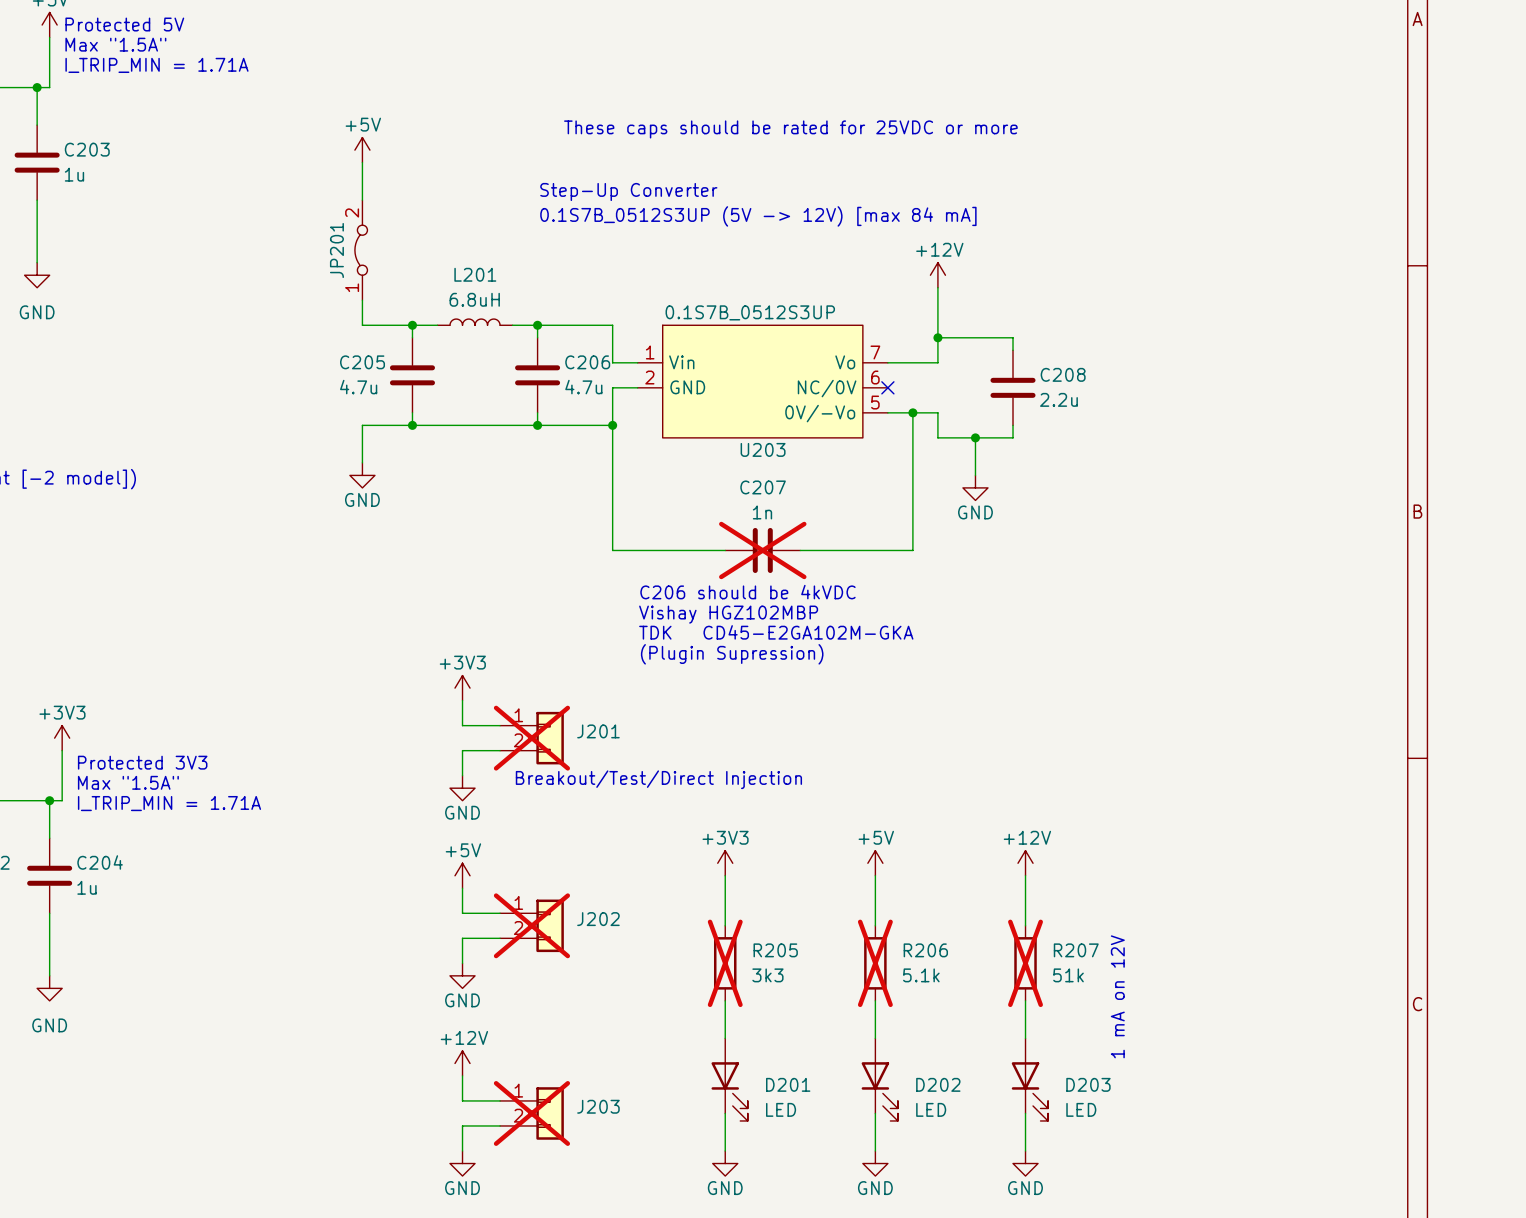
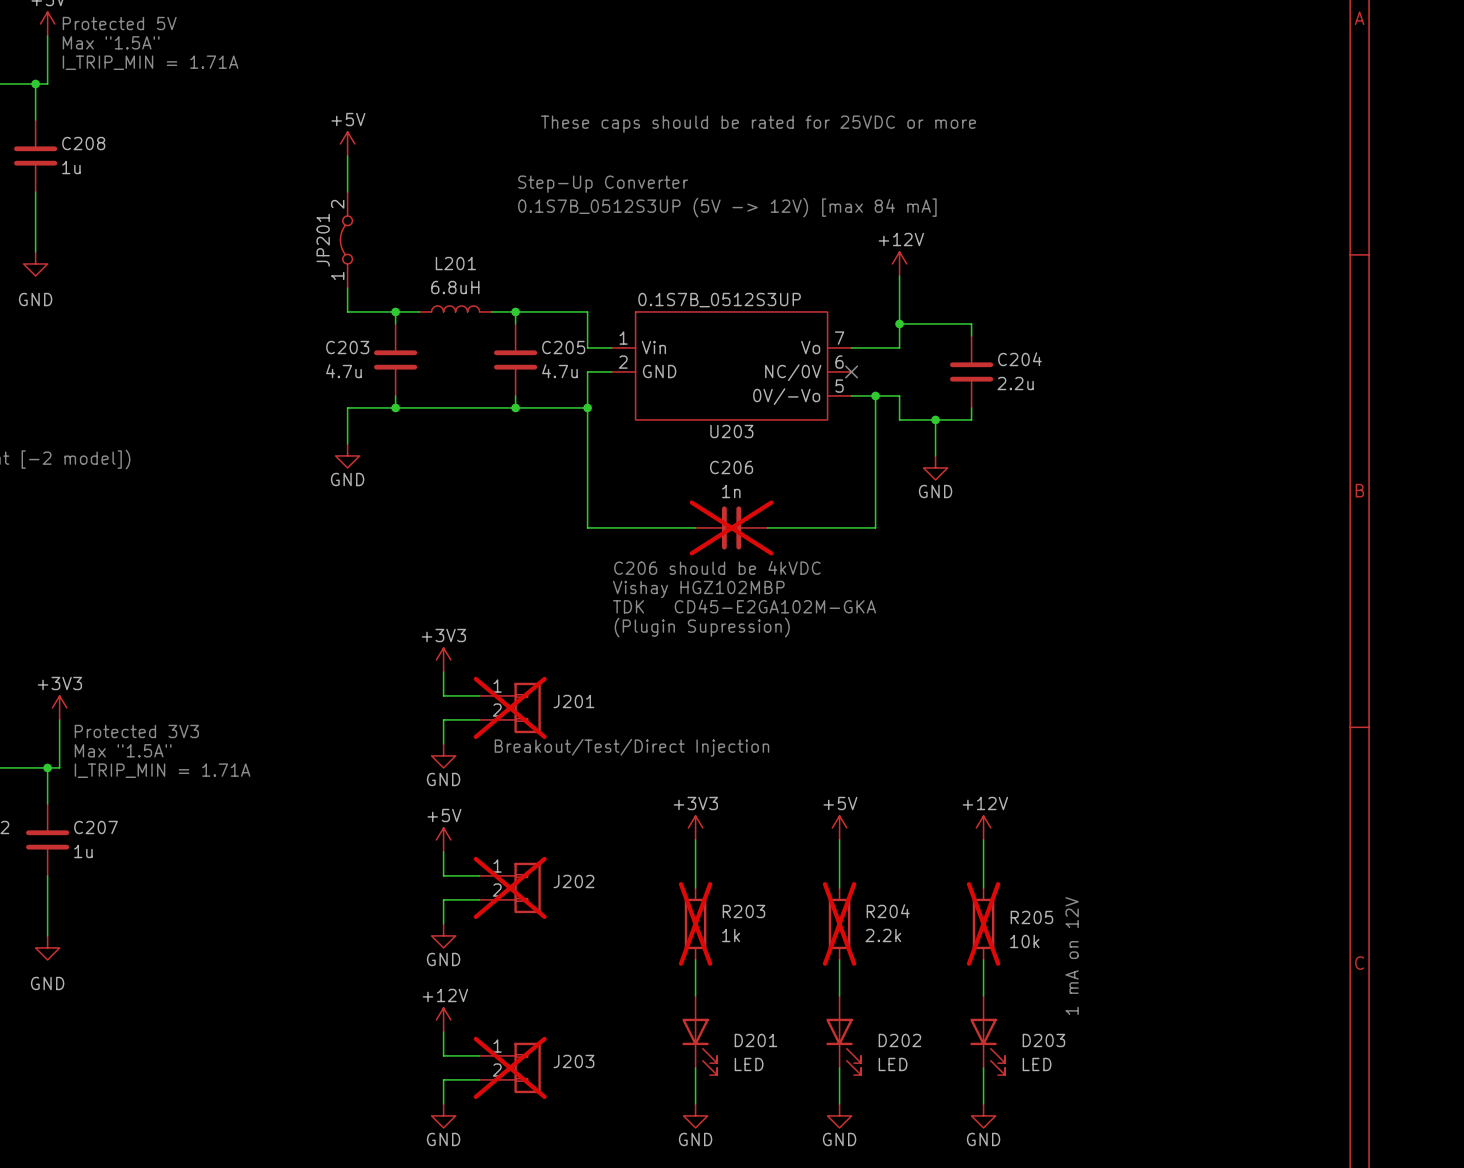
C203 name: C203 (87, 149) -> C208 (83, 143)
C205 name: C205 (362, 362) -> C203 (347, 347)
C206 name: C206 (587, 362) -> C205 (563, 347)
C208 name: C208 (1063, 374) -> C204 (1019, 359)
C207 name: C207 (763, 487) -> C206 (731, 467)
C204 name: C204 (100, 862) -> C207 (95, 827)
R205 name: R205 (775, 950) -> R203 (743, 911)
R206 name: R206 (925, 950) -> R204 (888, 911)
R207 name: R207 (1076, 950) -> R205 (1031, 917)
R205 value: 3k3 (767, 975) -> 1k (731, 935)
R206 value: 5.1k (921, 975) -> 2.2k (883, 935)
R207 value: 51k (1068, 975) -> 10k (1024, 941)

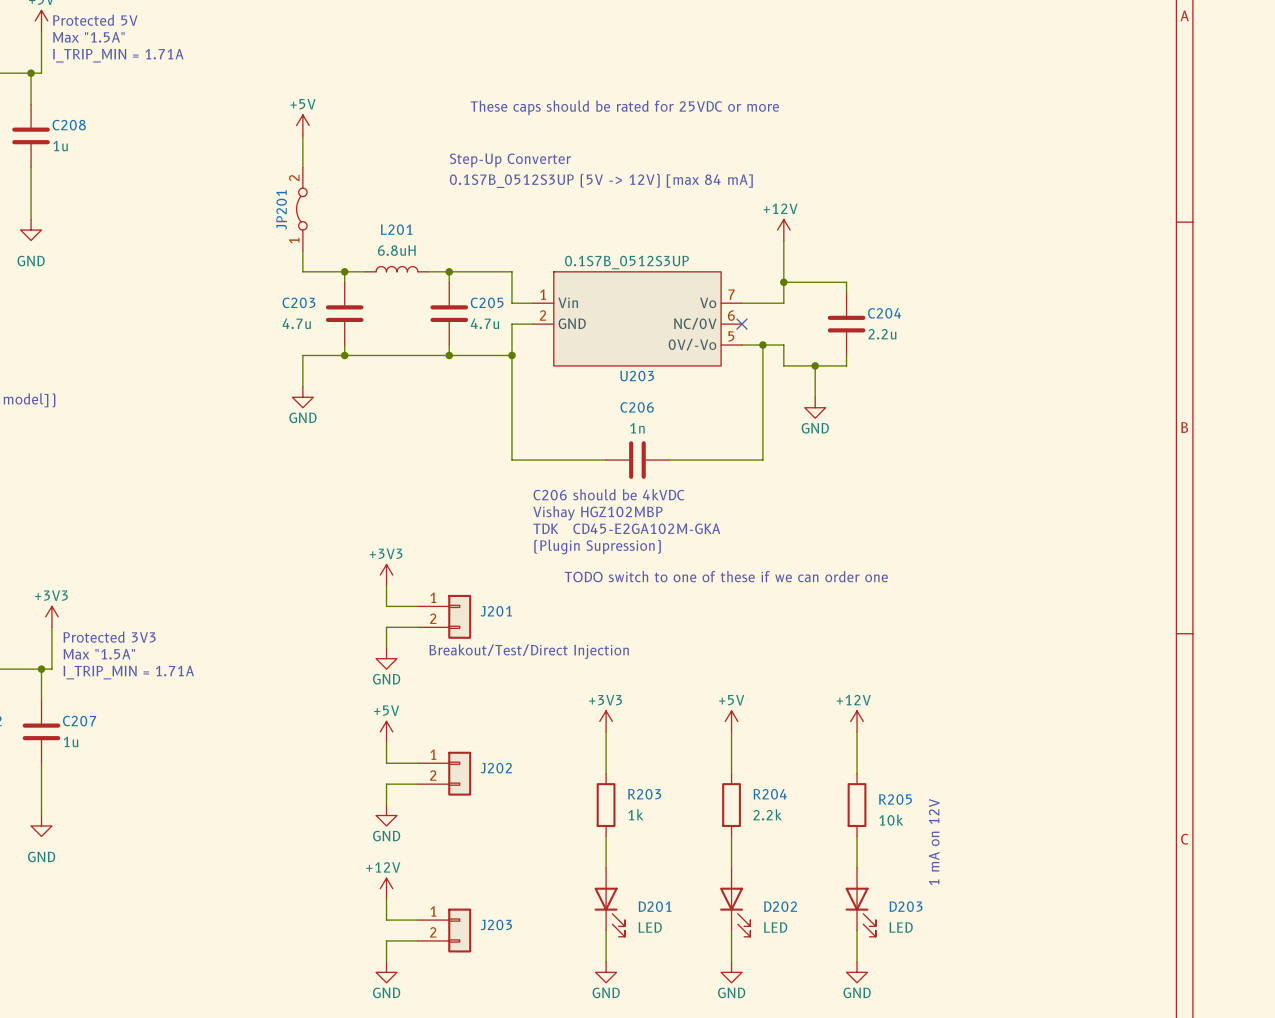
C206 do-not-place cross: (731, 527) -> none
text: none -> TODO switch to one of these if we can order one (726, 576)
J201 do-not-place cross: (510, 707) -> none
J202 do-not-place cross: (510, 887) -> none
R203 do-not-place cross: (695, 923) -> none
R204 do-not-place cross: (839, 923) -> none
R205 do-not-place cross: (983, 923) -> none
J203 do-not-place cross: (510, 1067) -> none

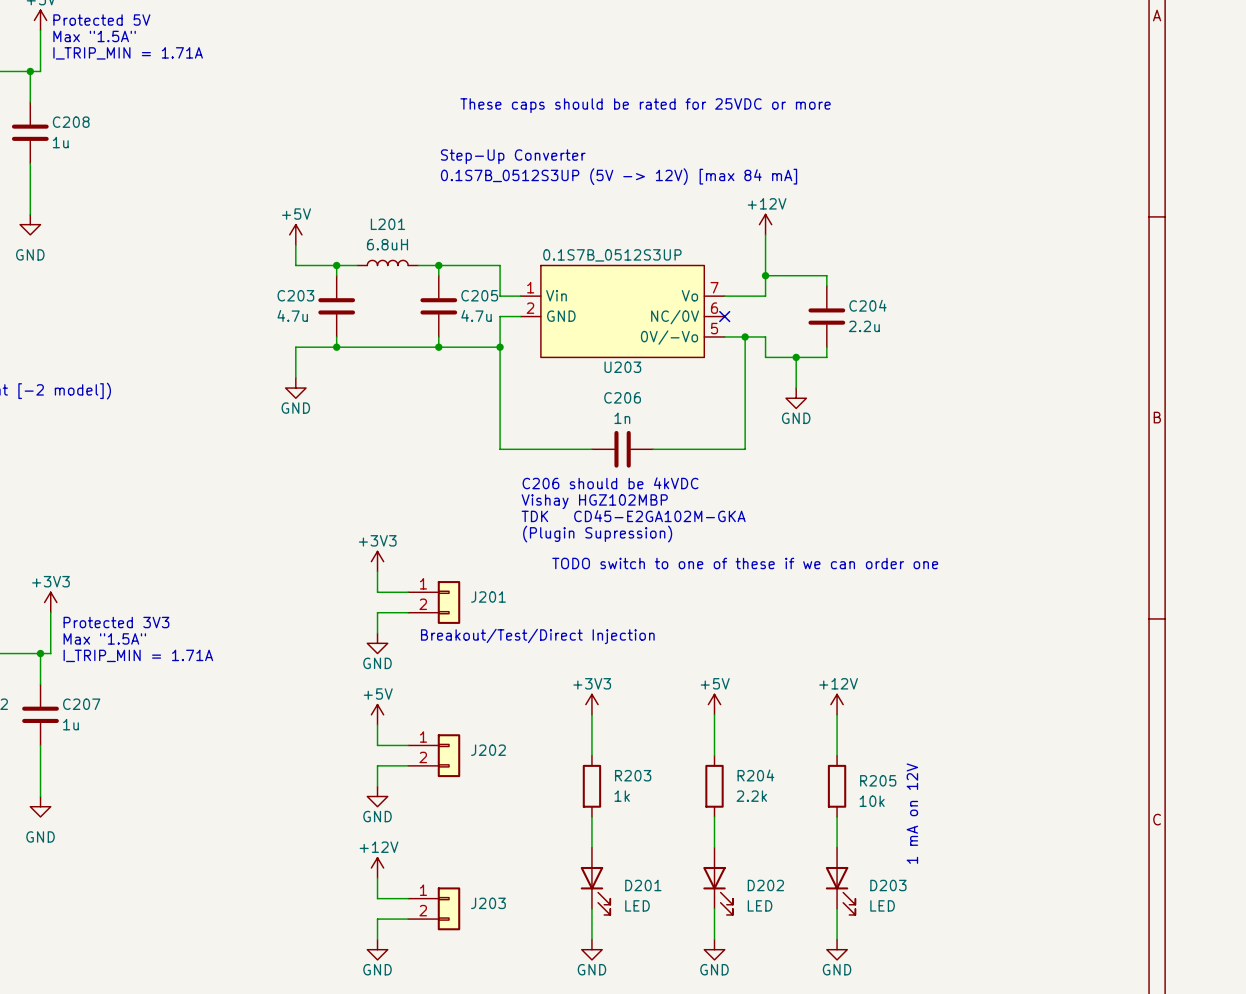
power symbol position: +5V (302, 125) -> +5V (295, 234)
wire: (302, 135) (302, 167) -> none
JP201: (301, 209) -> none

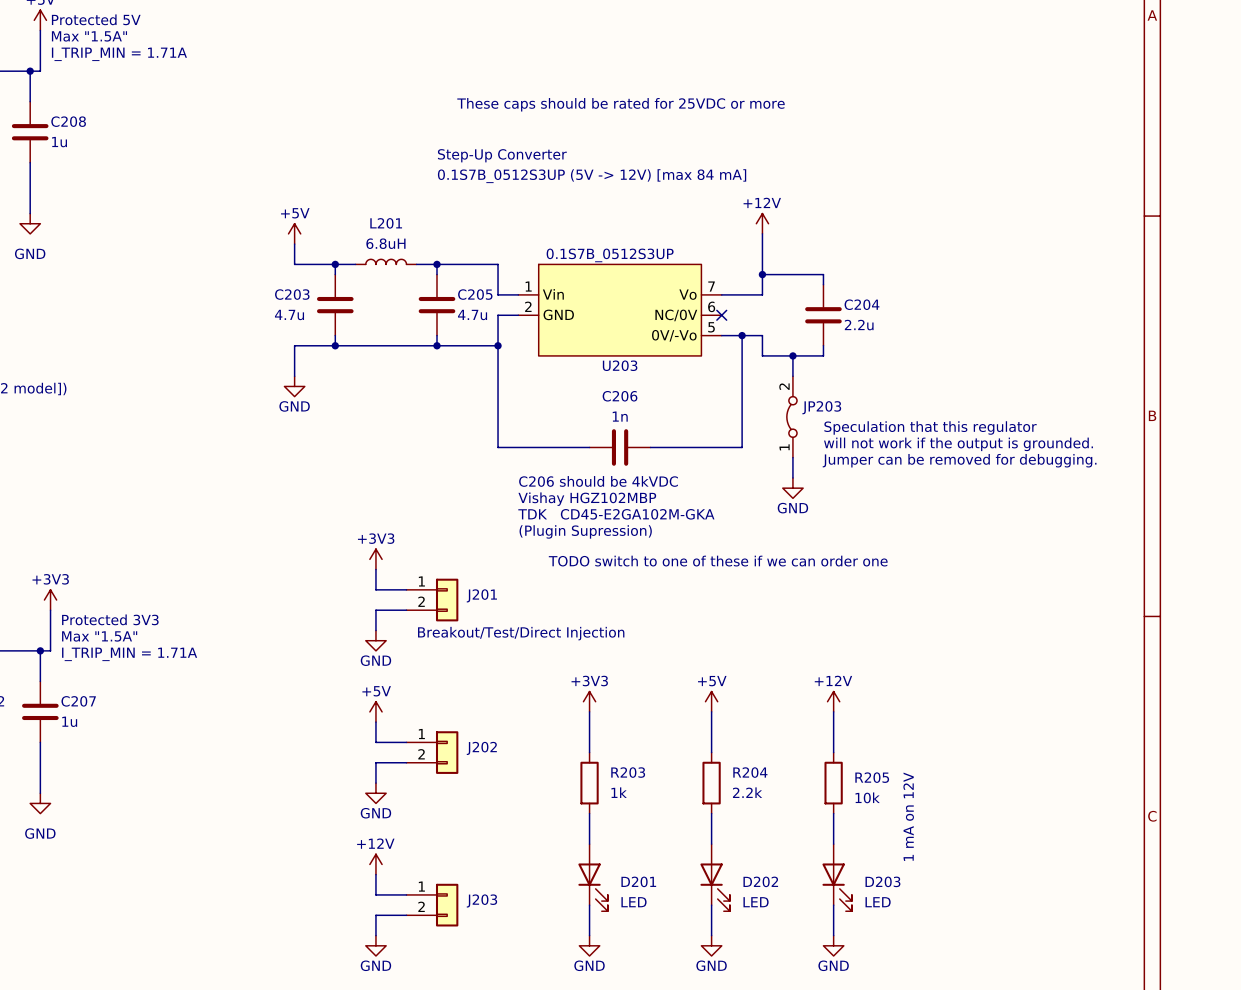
power symbol position: GND (796, 398) -> GND (792, 488)
JP203: none -> (791, 416)
text: none -> Speculation that this regulator (930, 427)
text: none -> will not work if the output is grounded. (958, 444)
wire: none -> (792, 457) (792, 477)
text: none -> Jumper can be removed for debugging. (959, 460)

